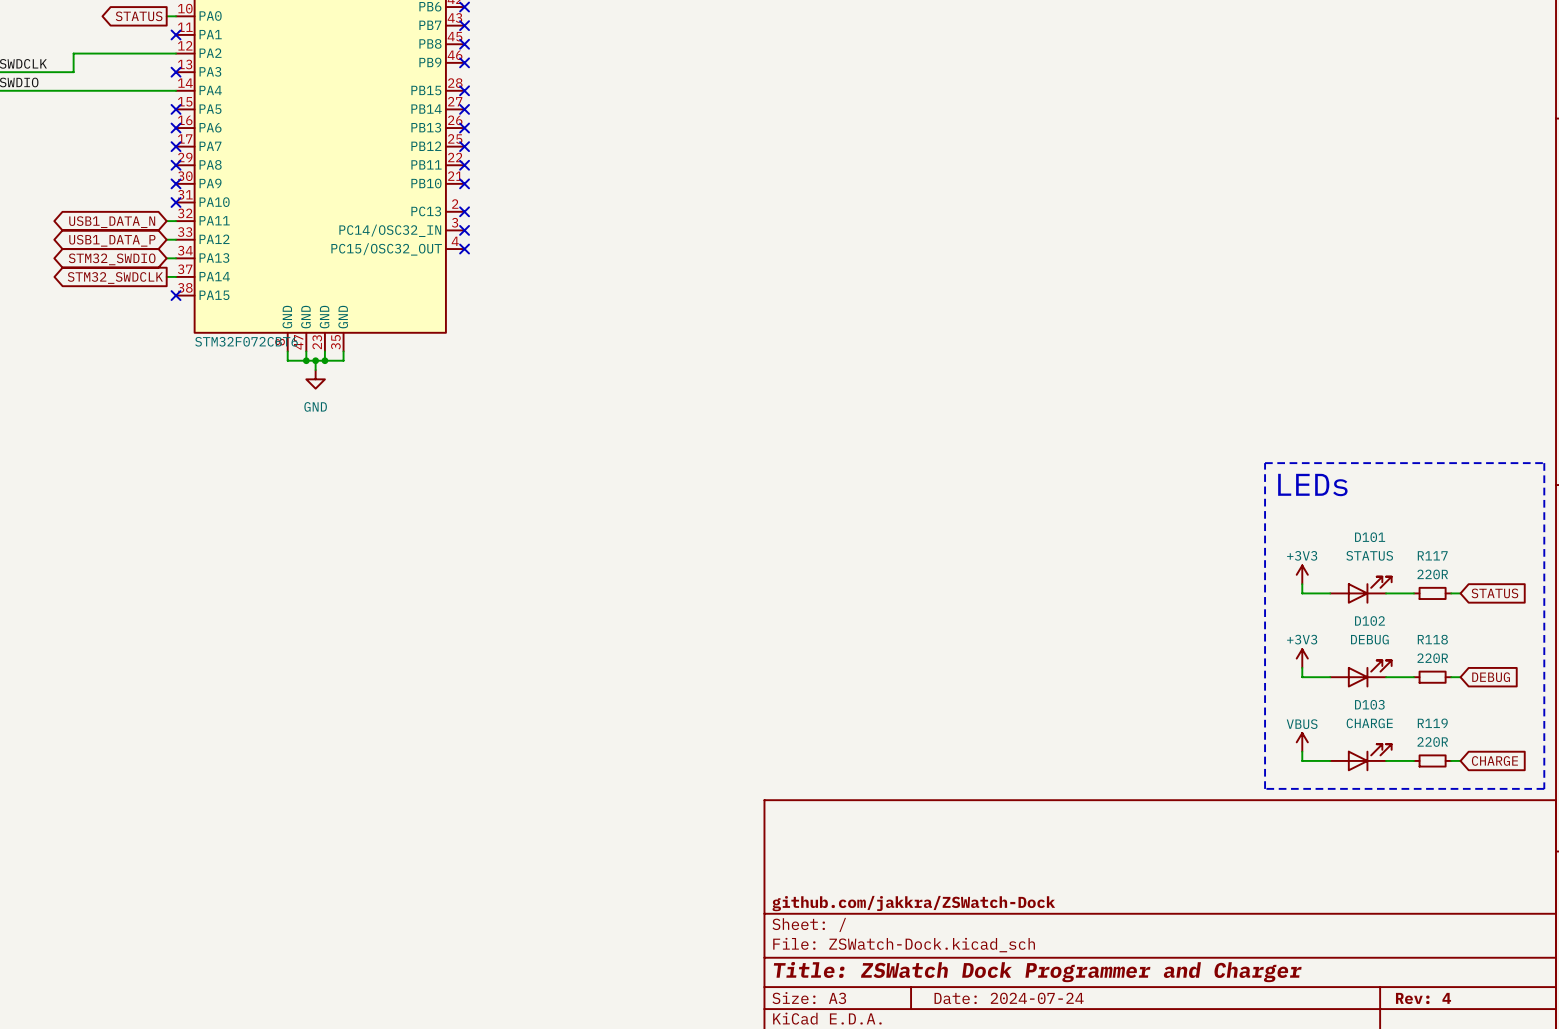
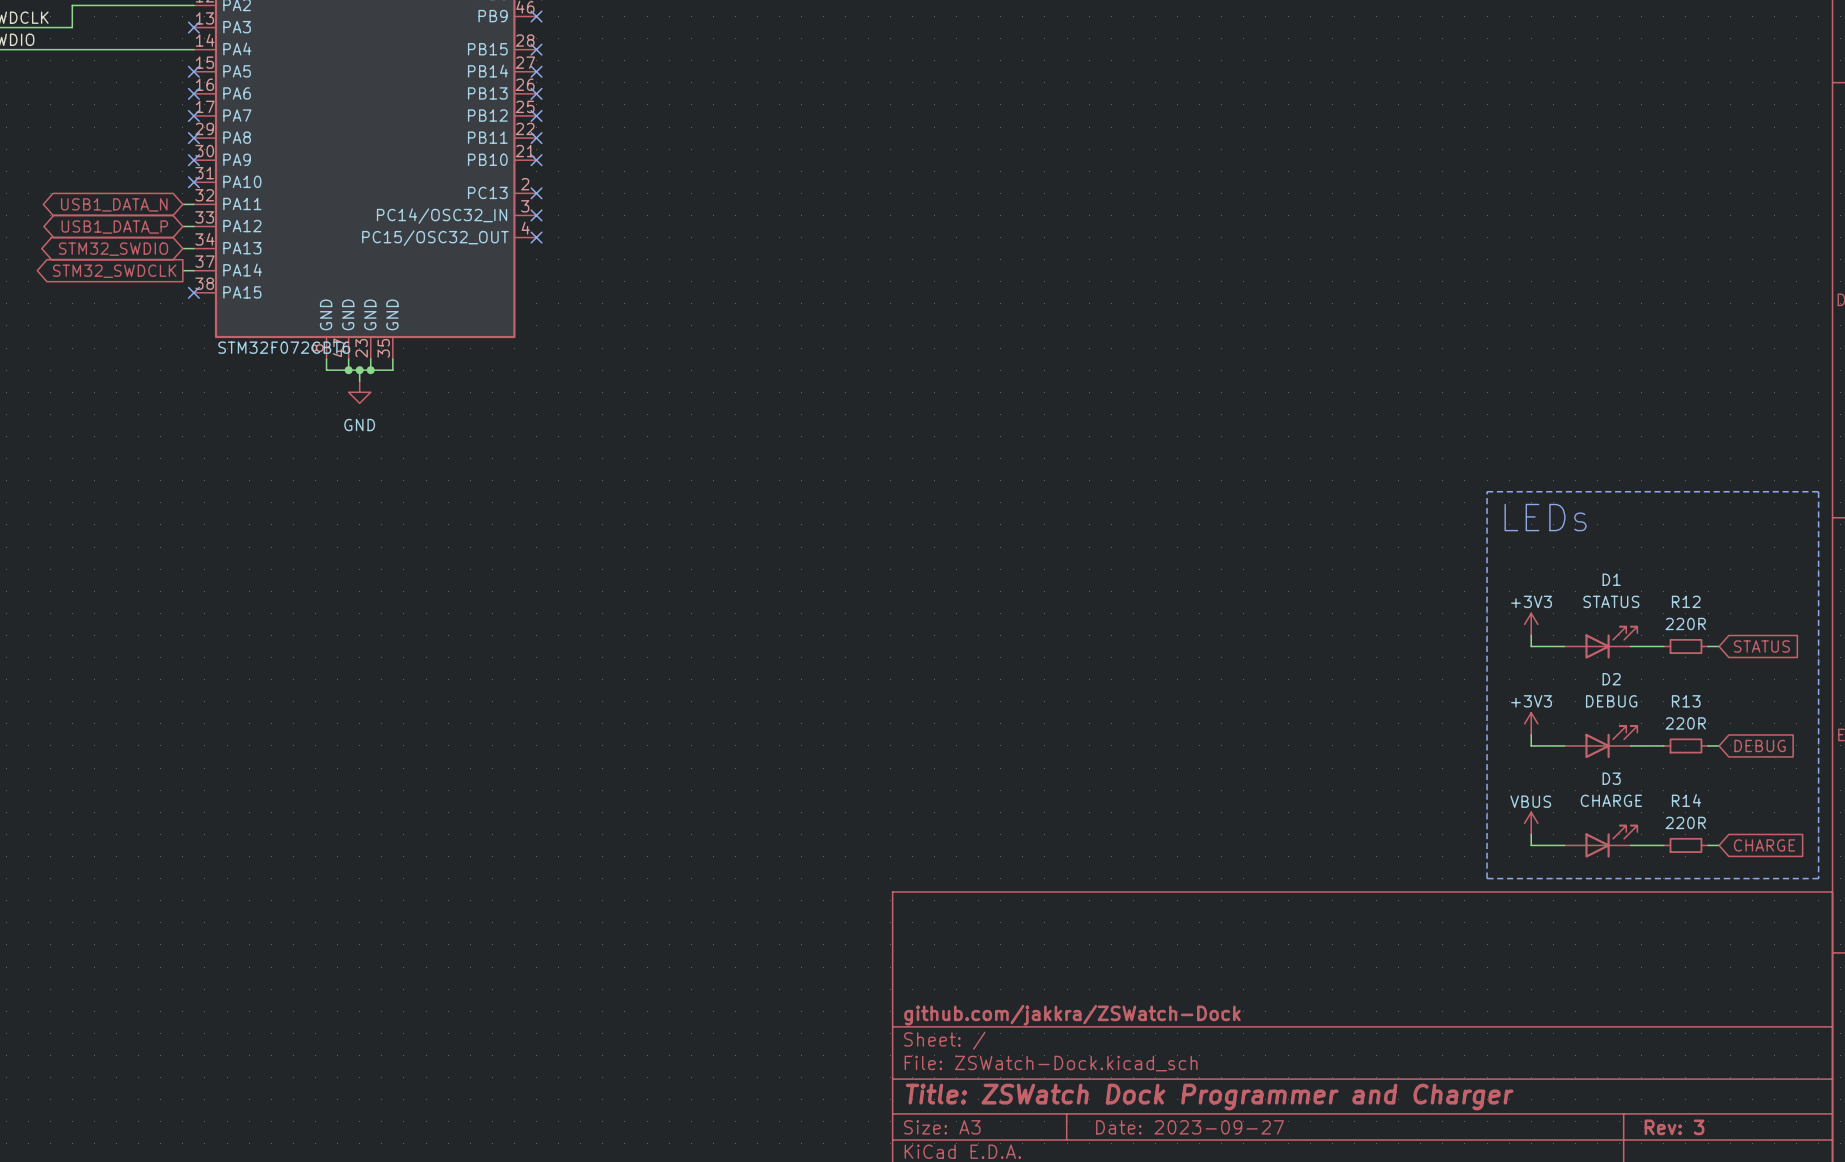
D101 name: D101 (1370, 537) -> D1 (1611, 579)
R117 name: R117 (1432, 555) -> R12 (1686, 601)
D102 name: D102 (1369, 621) -> D2 (1611, 679)
R118 name: R118 (1432, 639) -> R13 (1686, 701)
D103 name: D103 (1369, 704) -> D3 (1611, 778)
R119 name: R119 (1432, 723) -> R14 (1686, 800)
title block: Date: 2024-07-24 (1009, 998) -> Date: 2023-09-27 (1190, 1127)
title block: Rev: 4 (1423, 998) -> Rev: 3 (1674, 1127)

